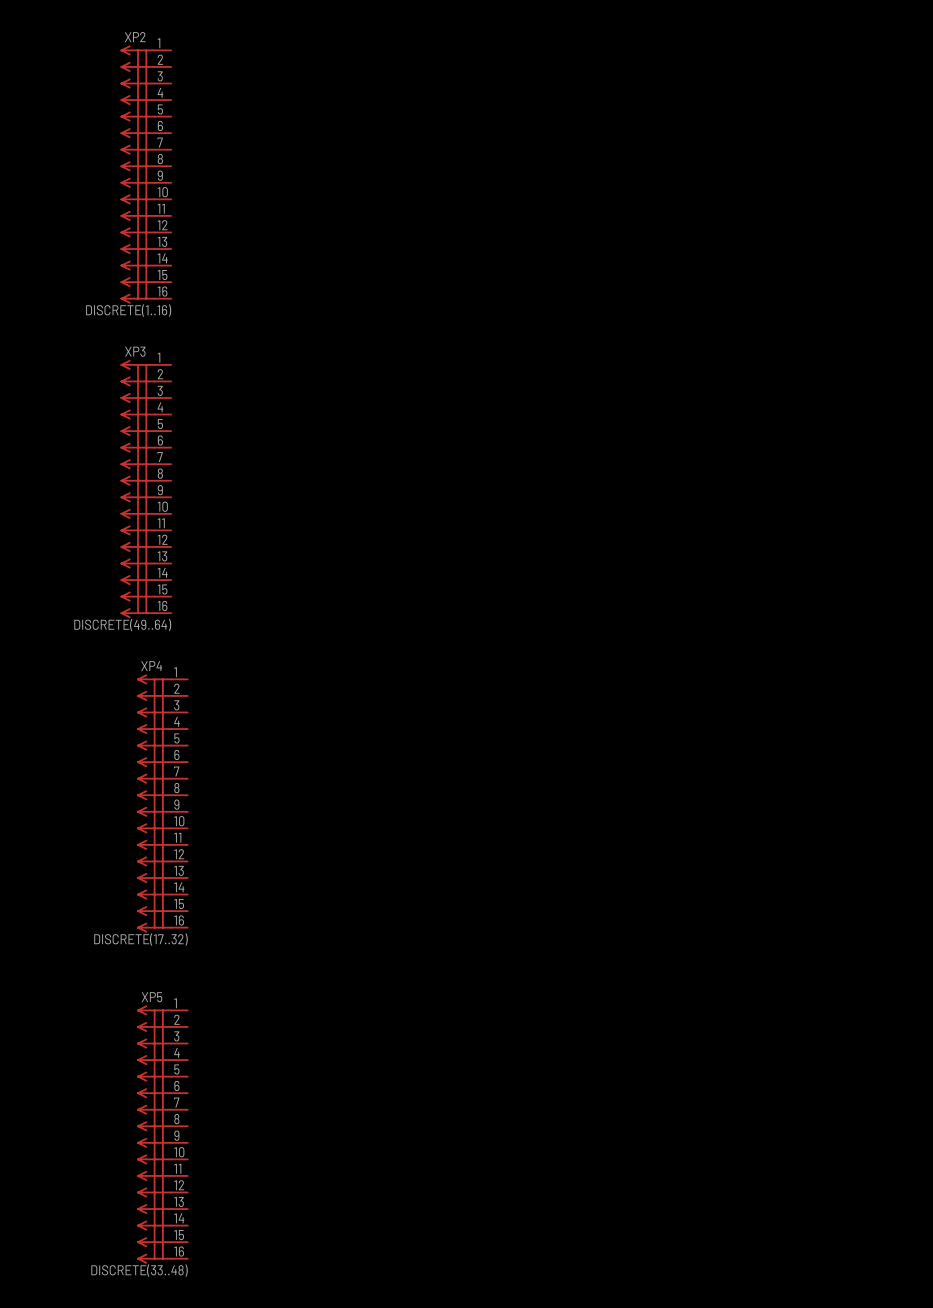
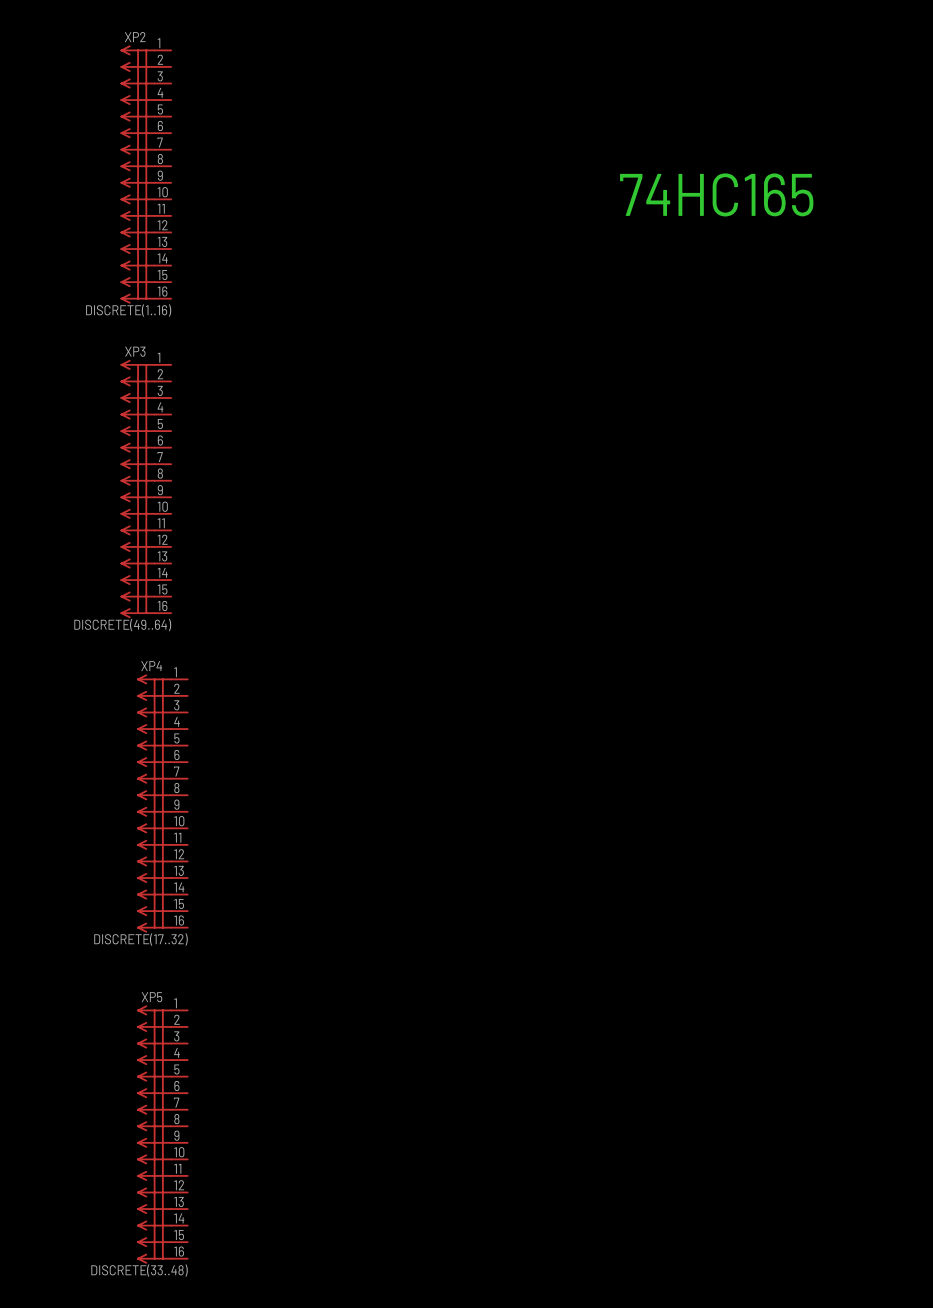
text: none -> 74HC165 (716, 194)

